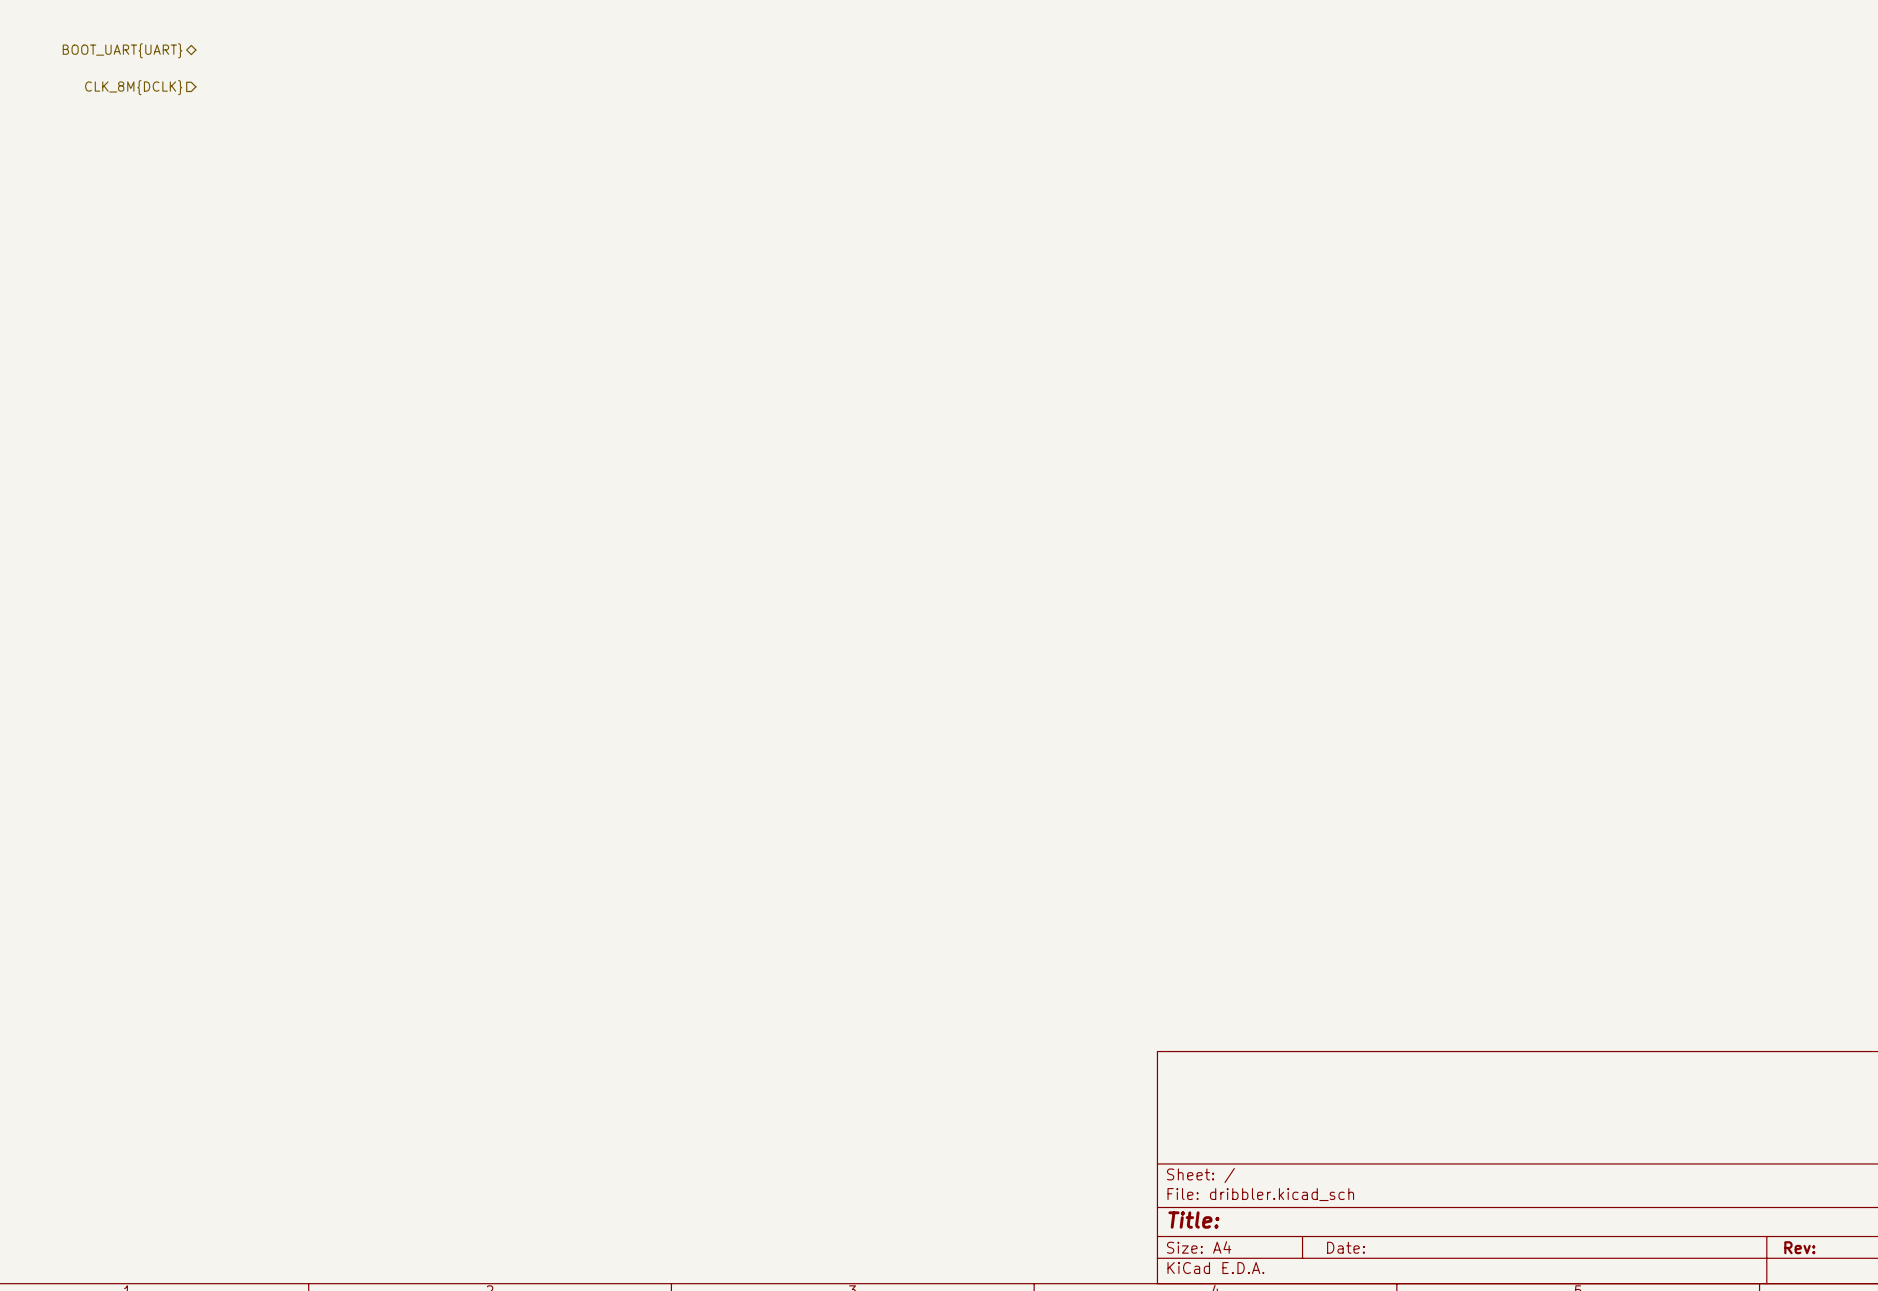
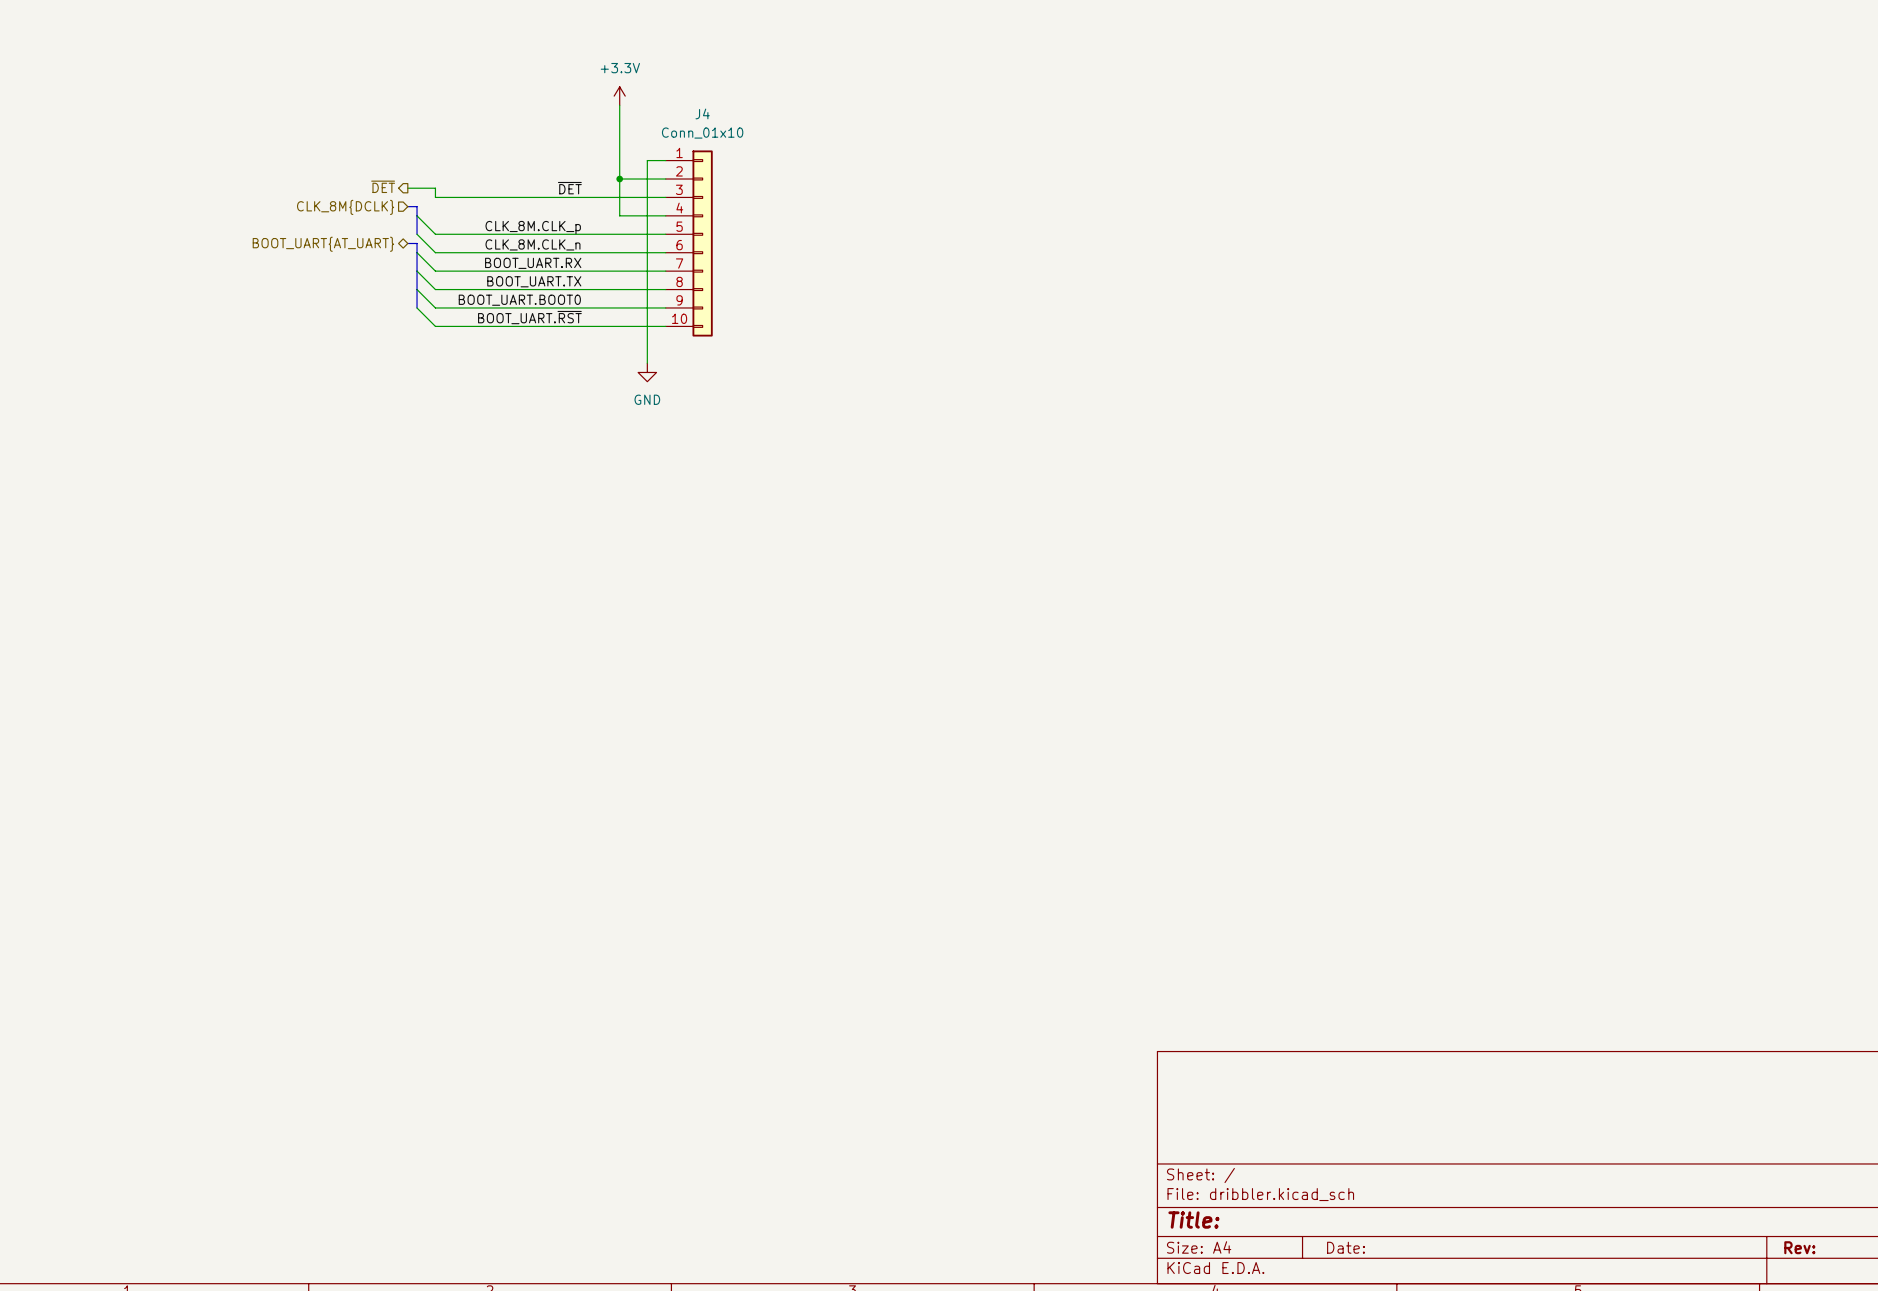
hierarchical label: BOOT_UART{UART} (122, 50) -> none
hierarchical label: CLK_8M{DCLK} (133, 87) -> none
power symbol: none -> +3.3V (619, 96)
wire: none -> (619, 105) (619, 215) (665, 215)
wire: none -> (665, 160) (647, 160) (647, 363)
wire: none -> (619, 179) (665, 179)
junction: none -> (619, 179)
hierarchical label: none -> ~{DET} (383, 186)
wire: none -> (407, 188) (435, 188) (435, 197) (665, 197)
label: none -> ~{DET} (569, 188)
bus: none -> (407, 206) (417, 206) (417, 234)
hierarchical label: none -> CLK_8M{DCLK} (345, 207)
wire: none -> (417, 215) (435, 234) (665, 234)
label: none -> CLK_8M.CLK_p (533, 227)
wire: none -> (417, 234) (435, 252) (665, 252)
bus: none -> (407, 243) (417, 243) (417, 307)
J4: none -> Conn_01x10 (689, 243)
hierarchical label: none -> BOOT_UART{AT_UART} (323, 244)
label: none -> CLK_8M.CLK_n (532, 244)
wire: none -> (417, 252) (435, 271) (665, 271)
label: none -> BOOT_UART.RX (533, 263)
wire: none -> (417, 271) (435, 289) (665, 289)
label: none -> BOOT_UART.TX (534, 281)
wire: none -> (417, 289) (435, 307) (665, 307)
label: none -> BOOT_UART.BOOT0 (519, 300)
wire: none -> (417, 307) (435, 326) (665, 326)
label: none -> BOOT_UART.~{RST} (529, 317)
power symbol: none -> GND (647, 372)

